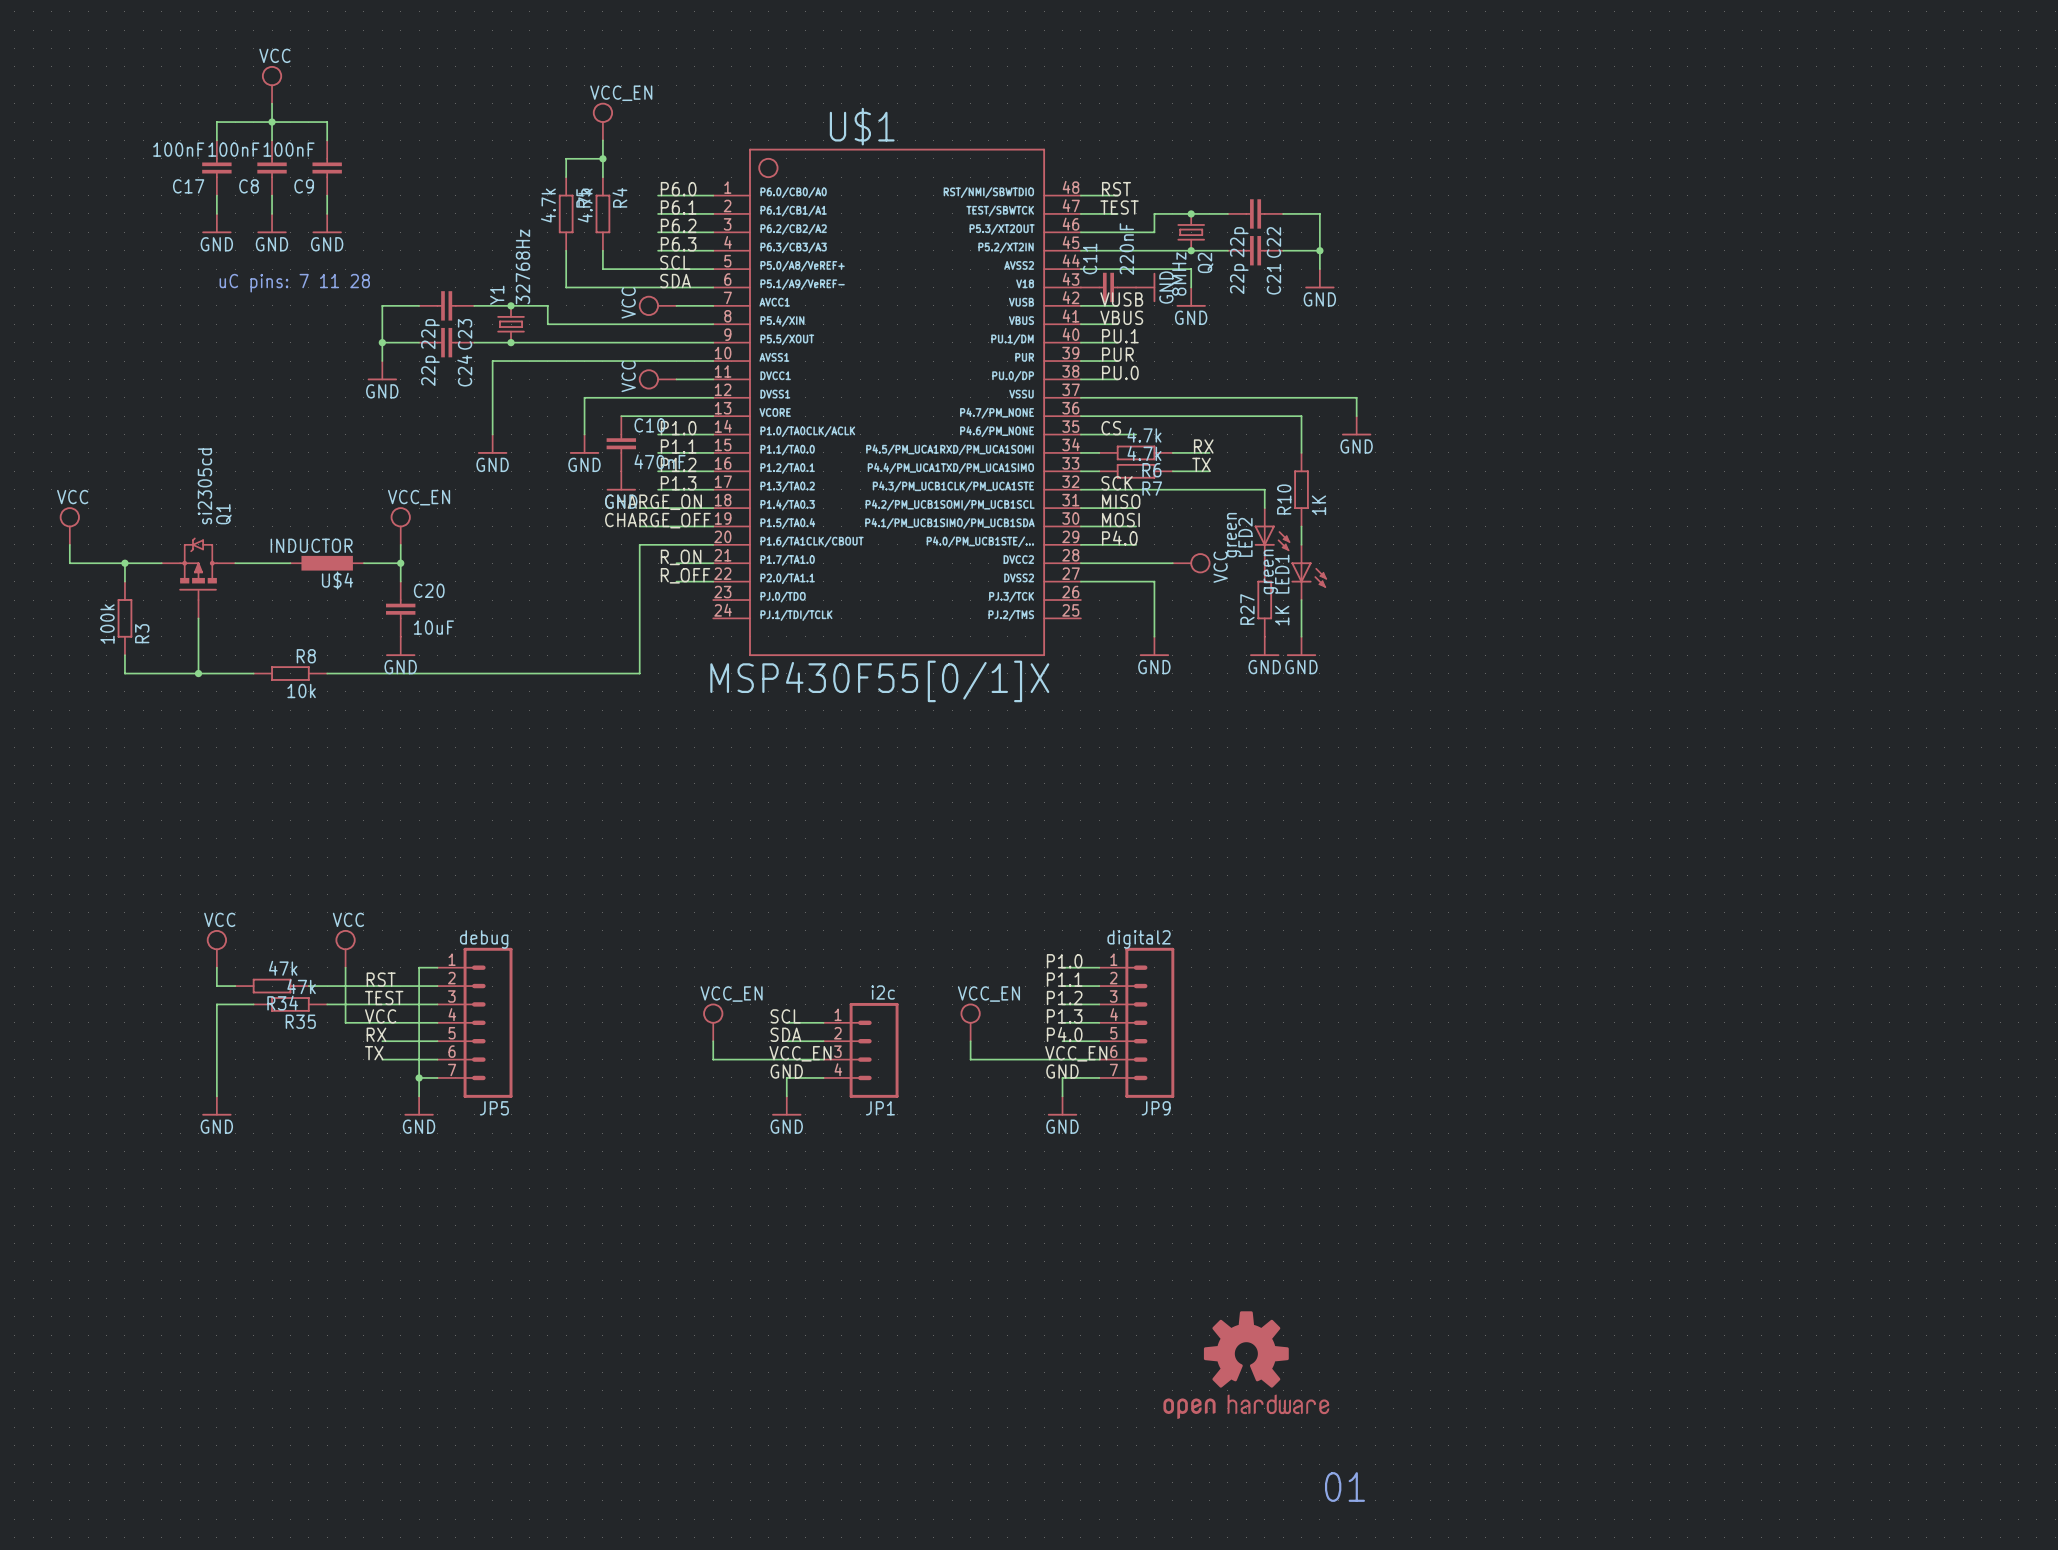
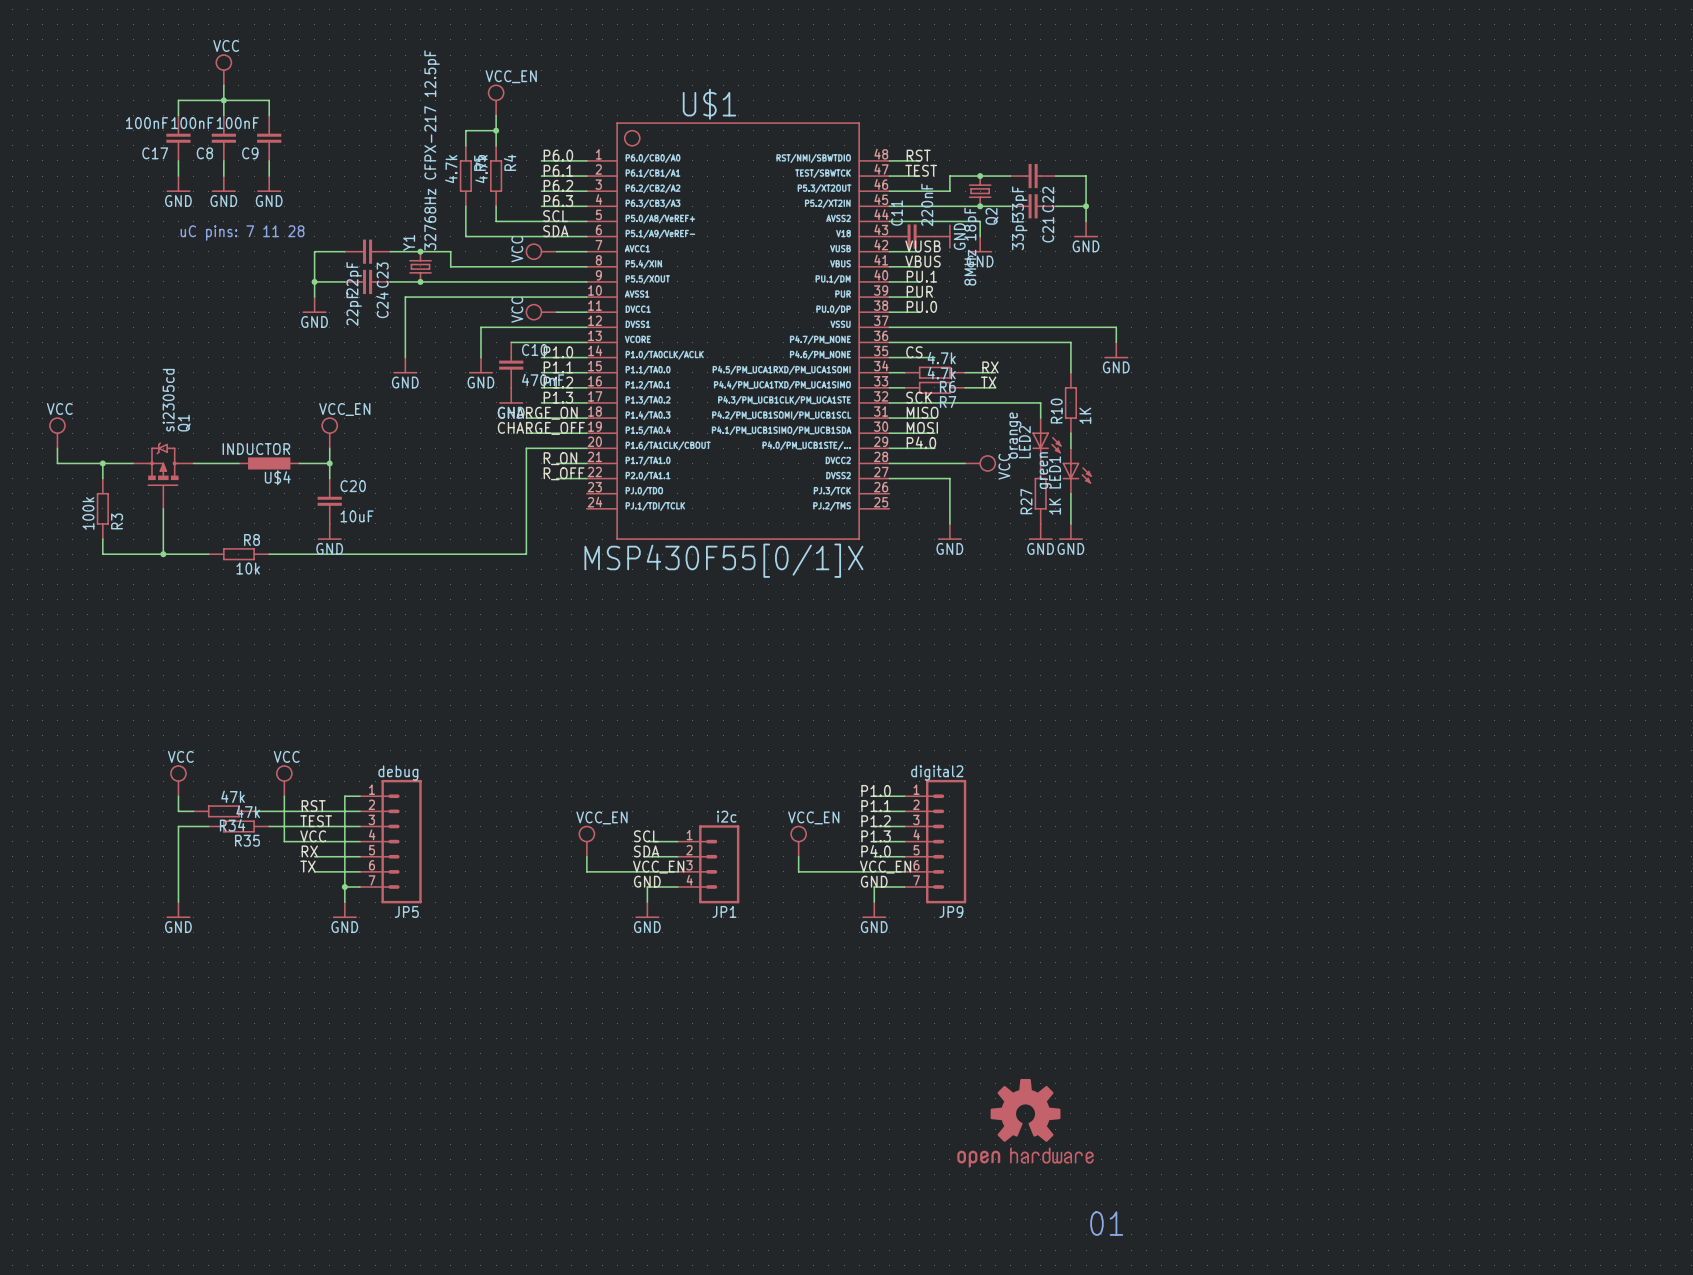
C22 value: 22p (1239, 242) -> 33pF (1019, 203)
Y1 value: 32768Hz (522, 266) -> 32768Hz CFPX-217 12.5pF (432, 150)
Q2 value: 8MHz (1179, 274) -> 8MHz 18pF (972, 246)
C21 value: 22p (1239, 278) -> 33pF (1019, 233)
C23 value: 22p (430, 334) -> 22pF (354, 278)
C24 value: 22p (430, 370) -> 22pF (354, 309)
LED2 value: green (1234, 535) -> orange (1015, 435)

